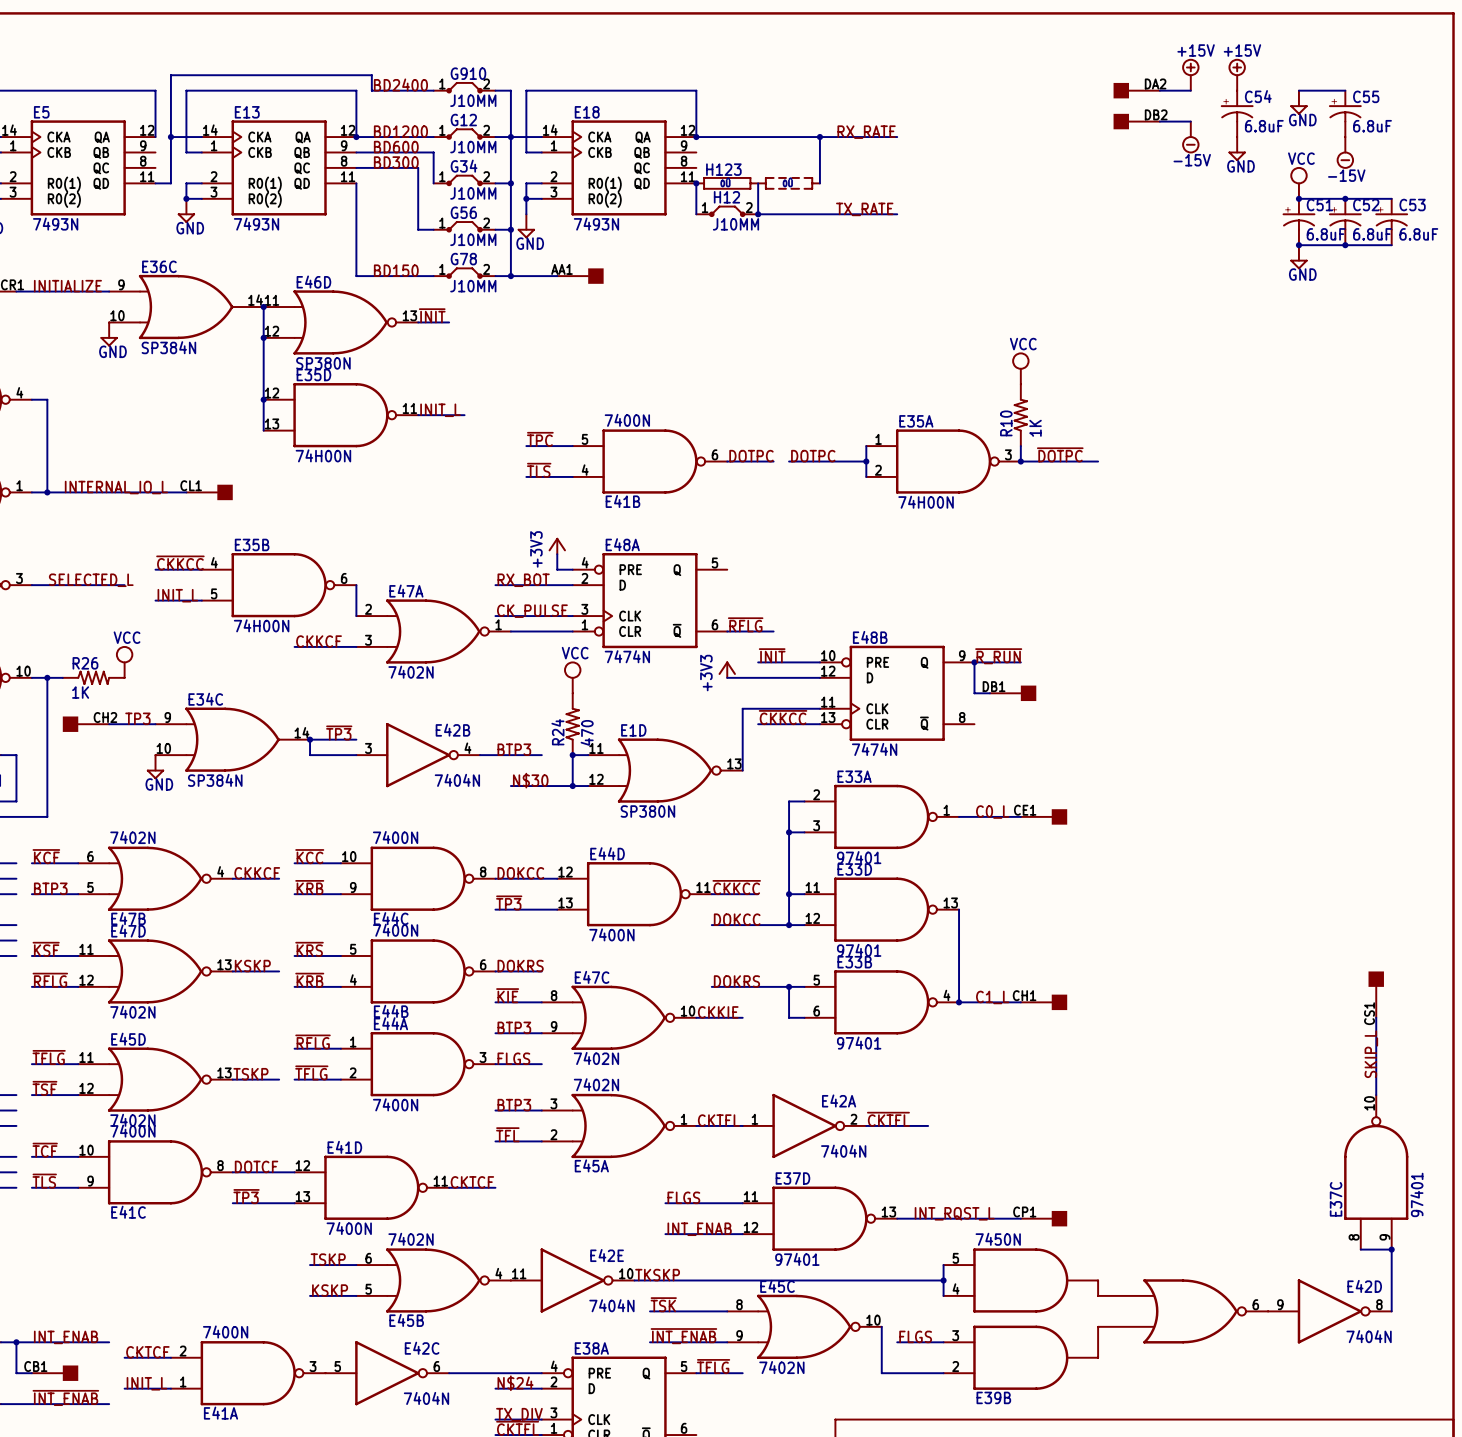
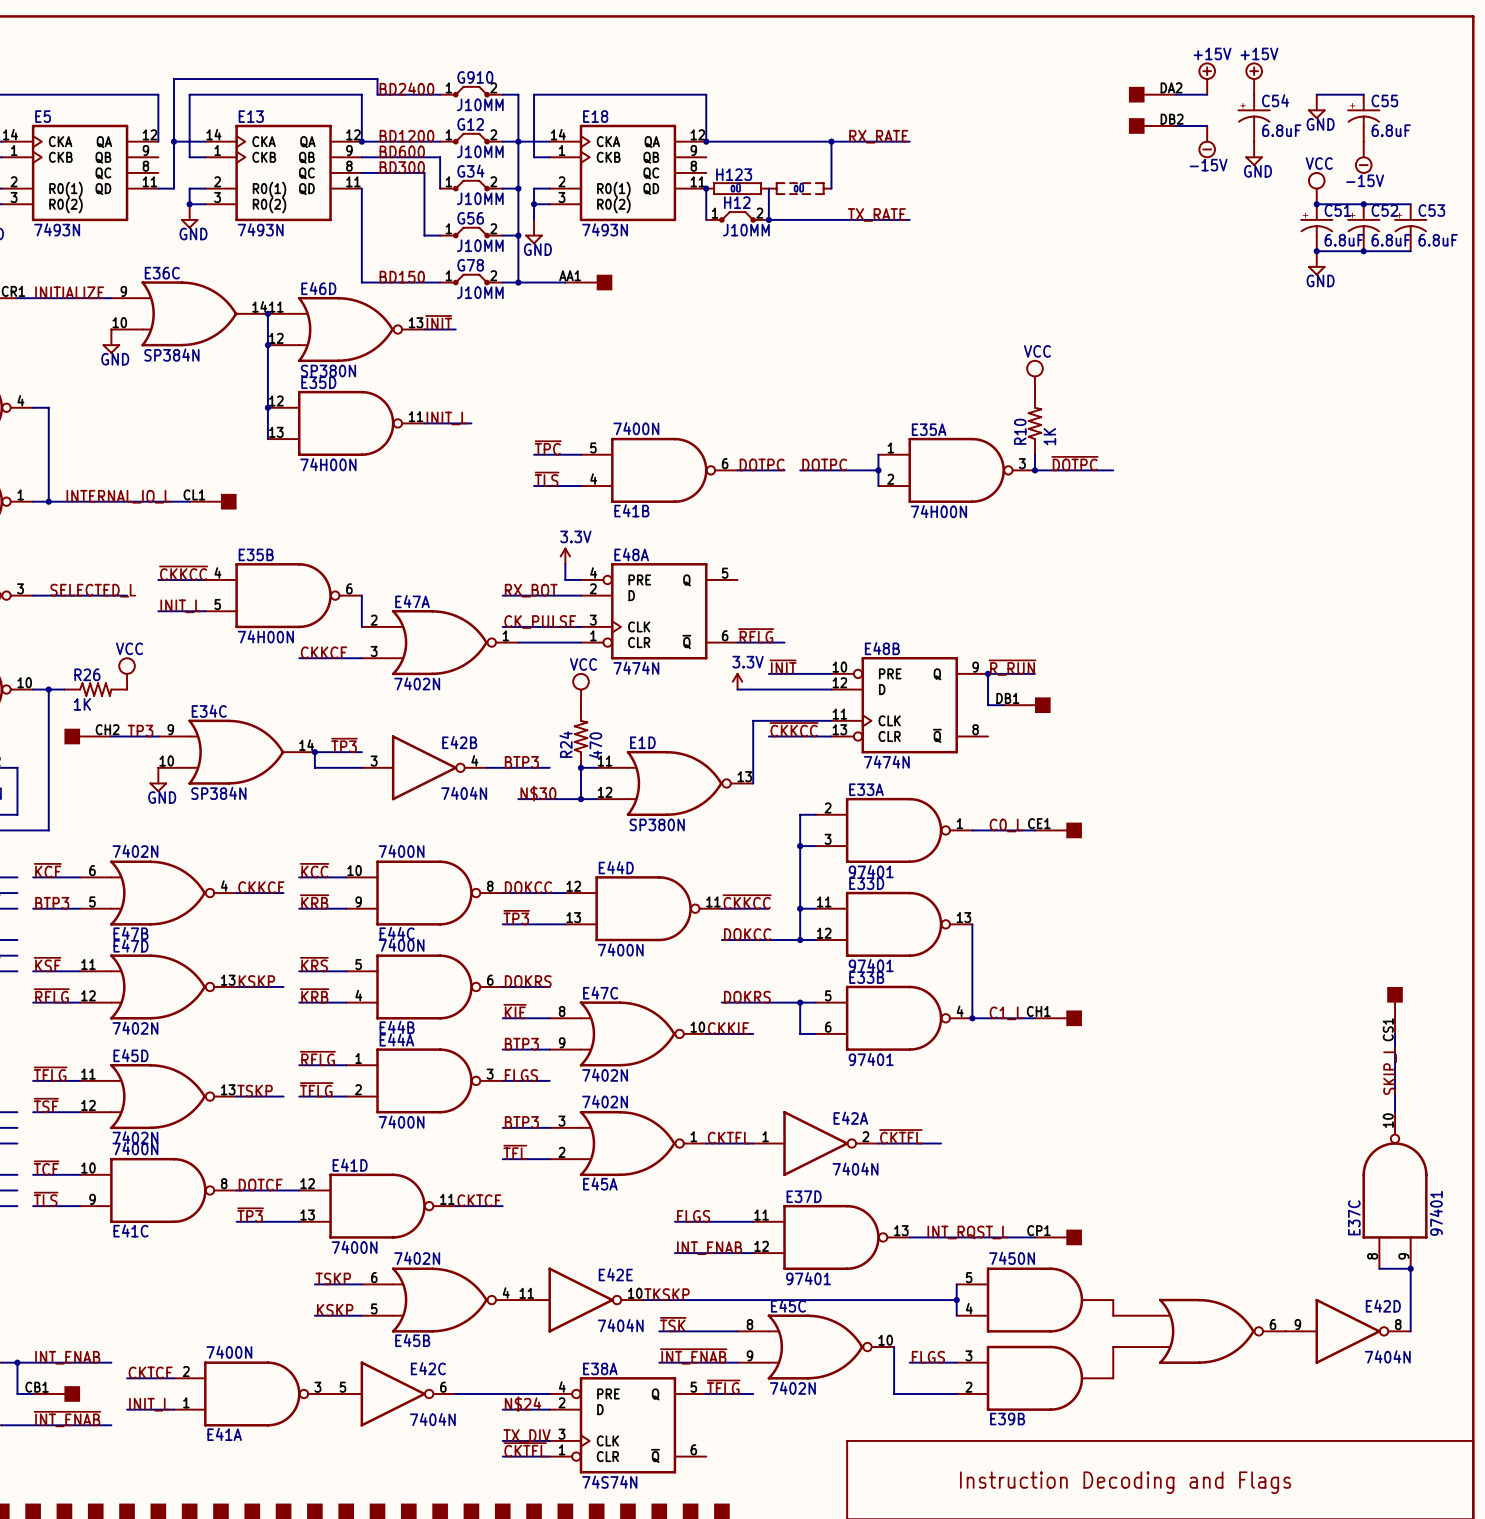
power symbol: +3V3 (557, 546) -> 3.3V (565, 556)
power symbol: +3V3 (727, 669) -> 3.3V (737, 681)

